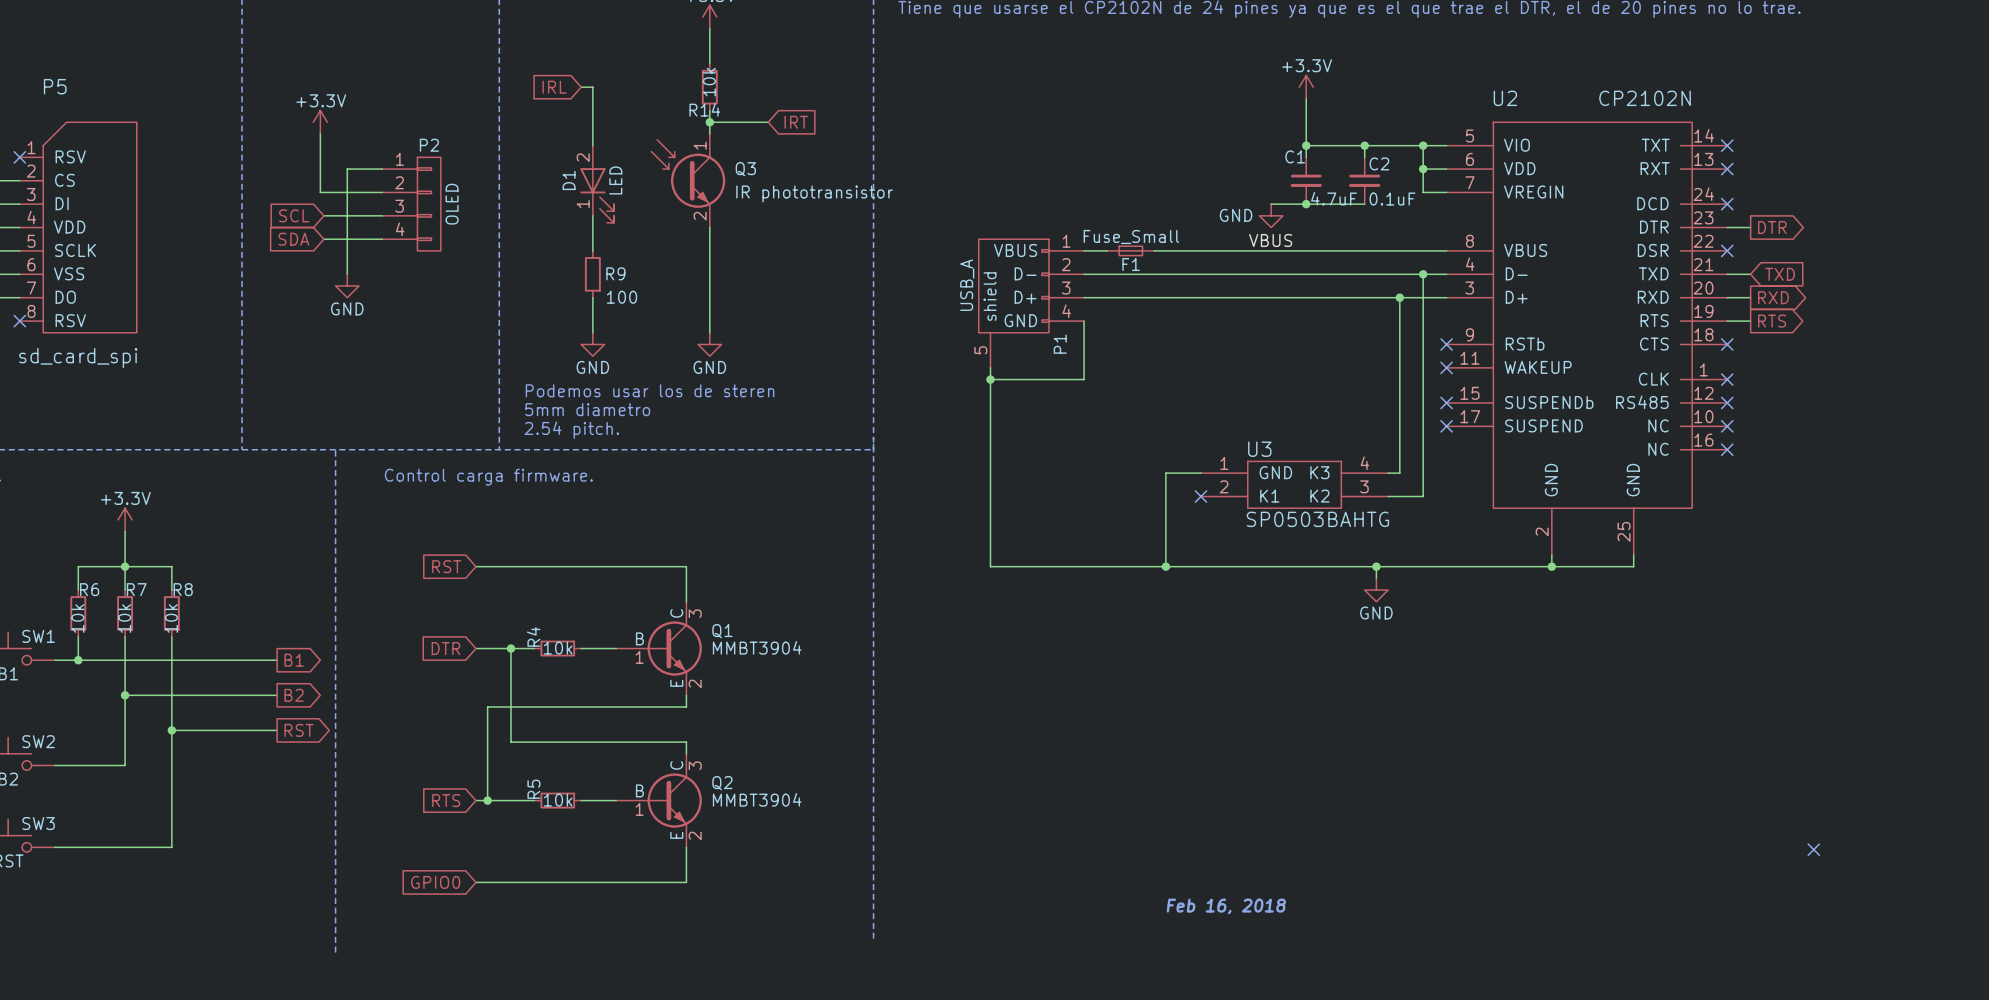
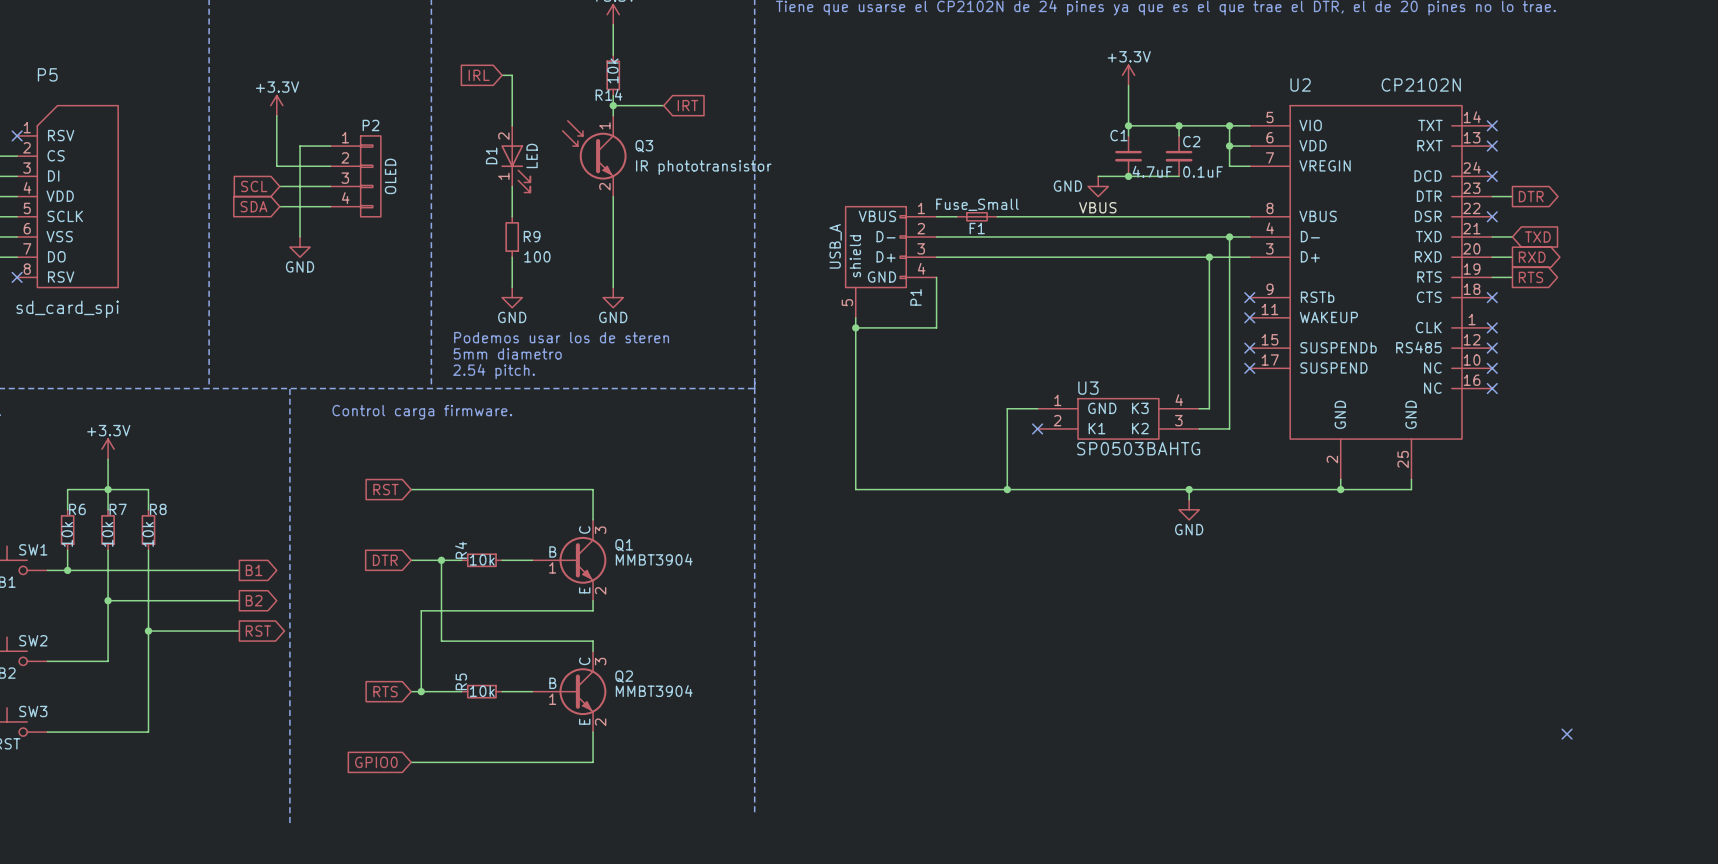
text: Feb 16, 2018 (1226, 906) -> none

